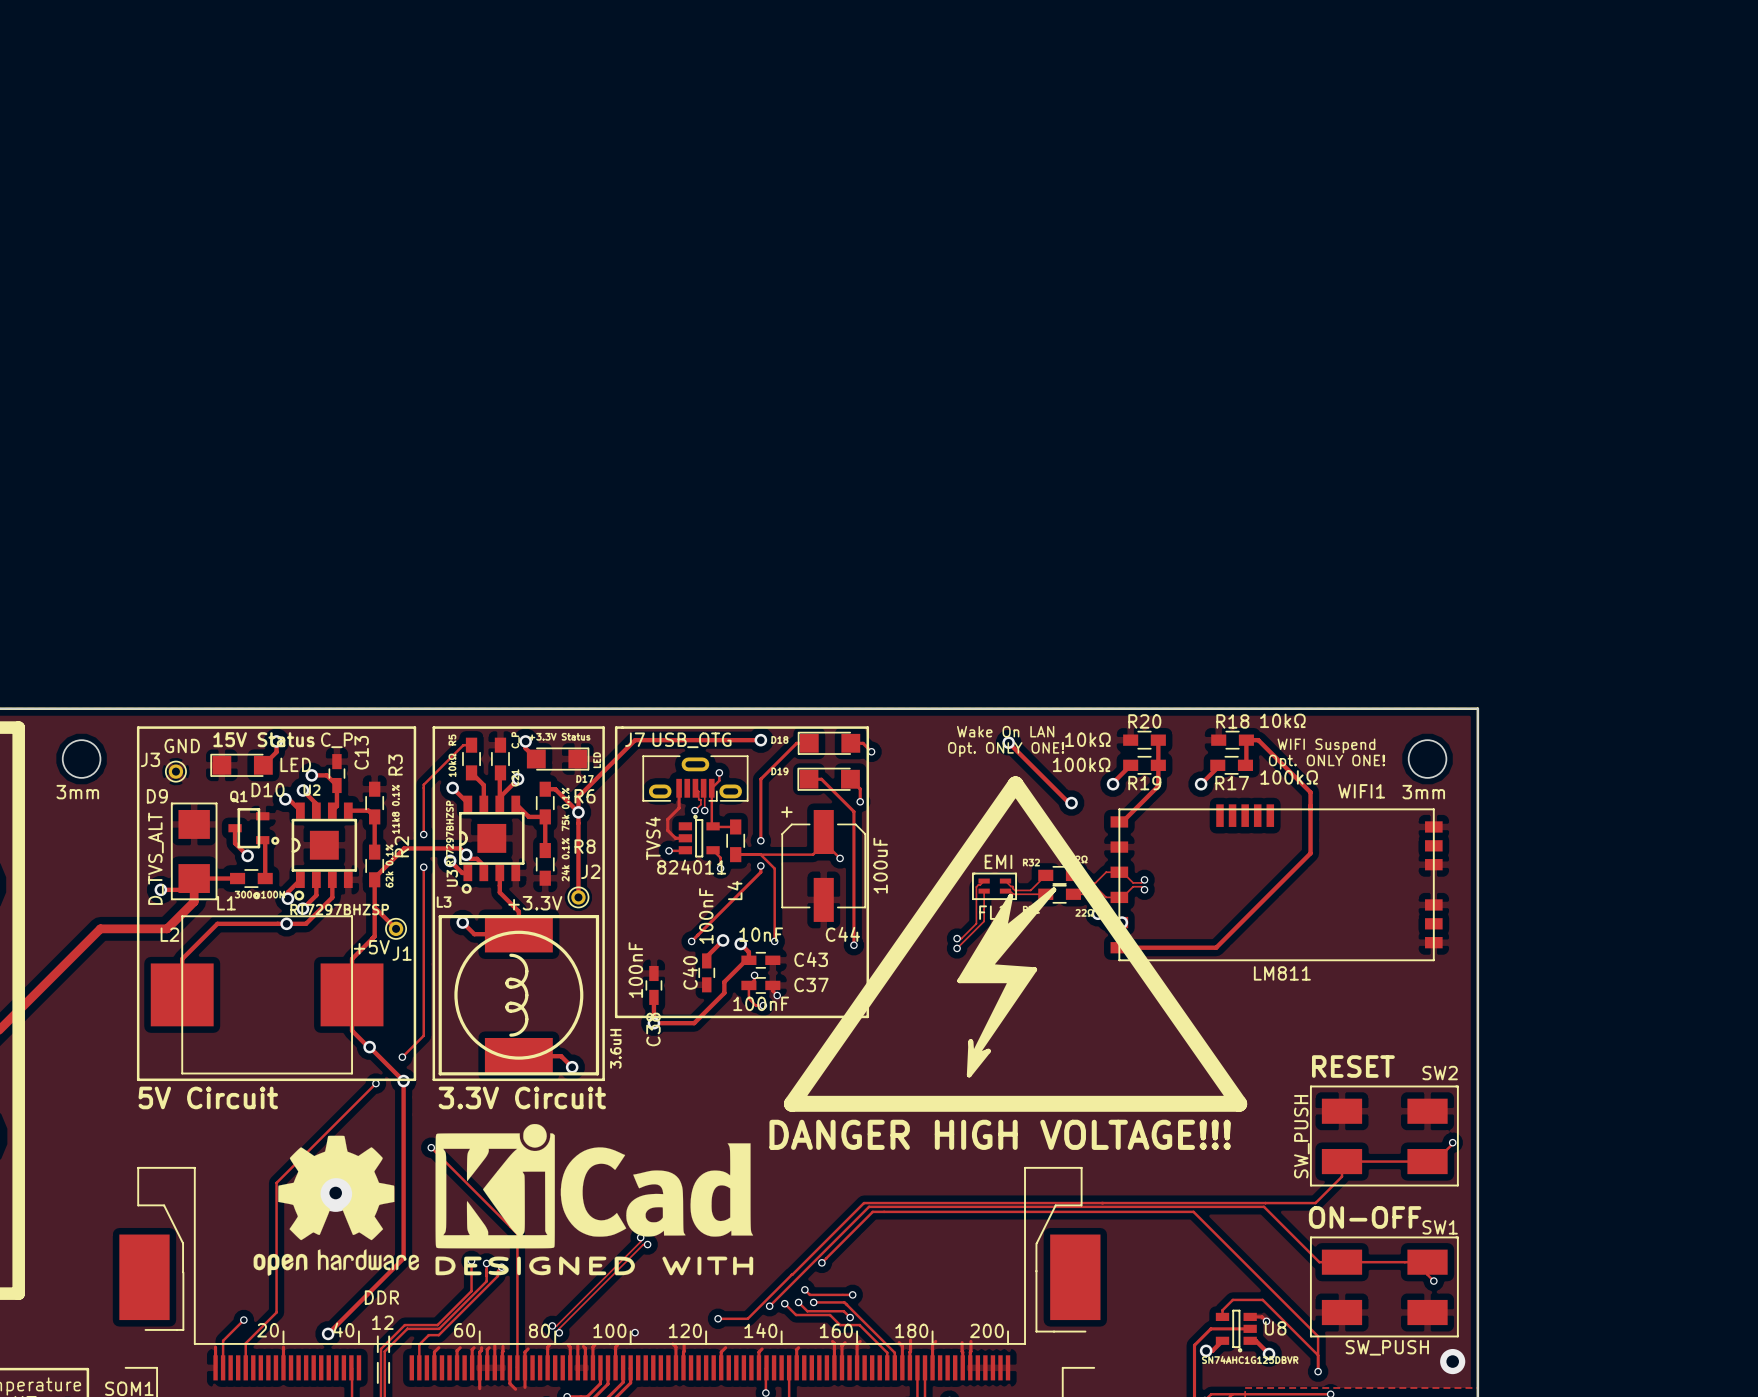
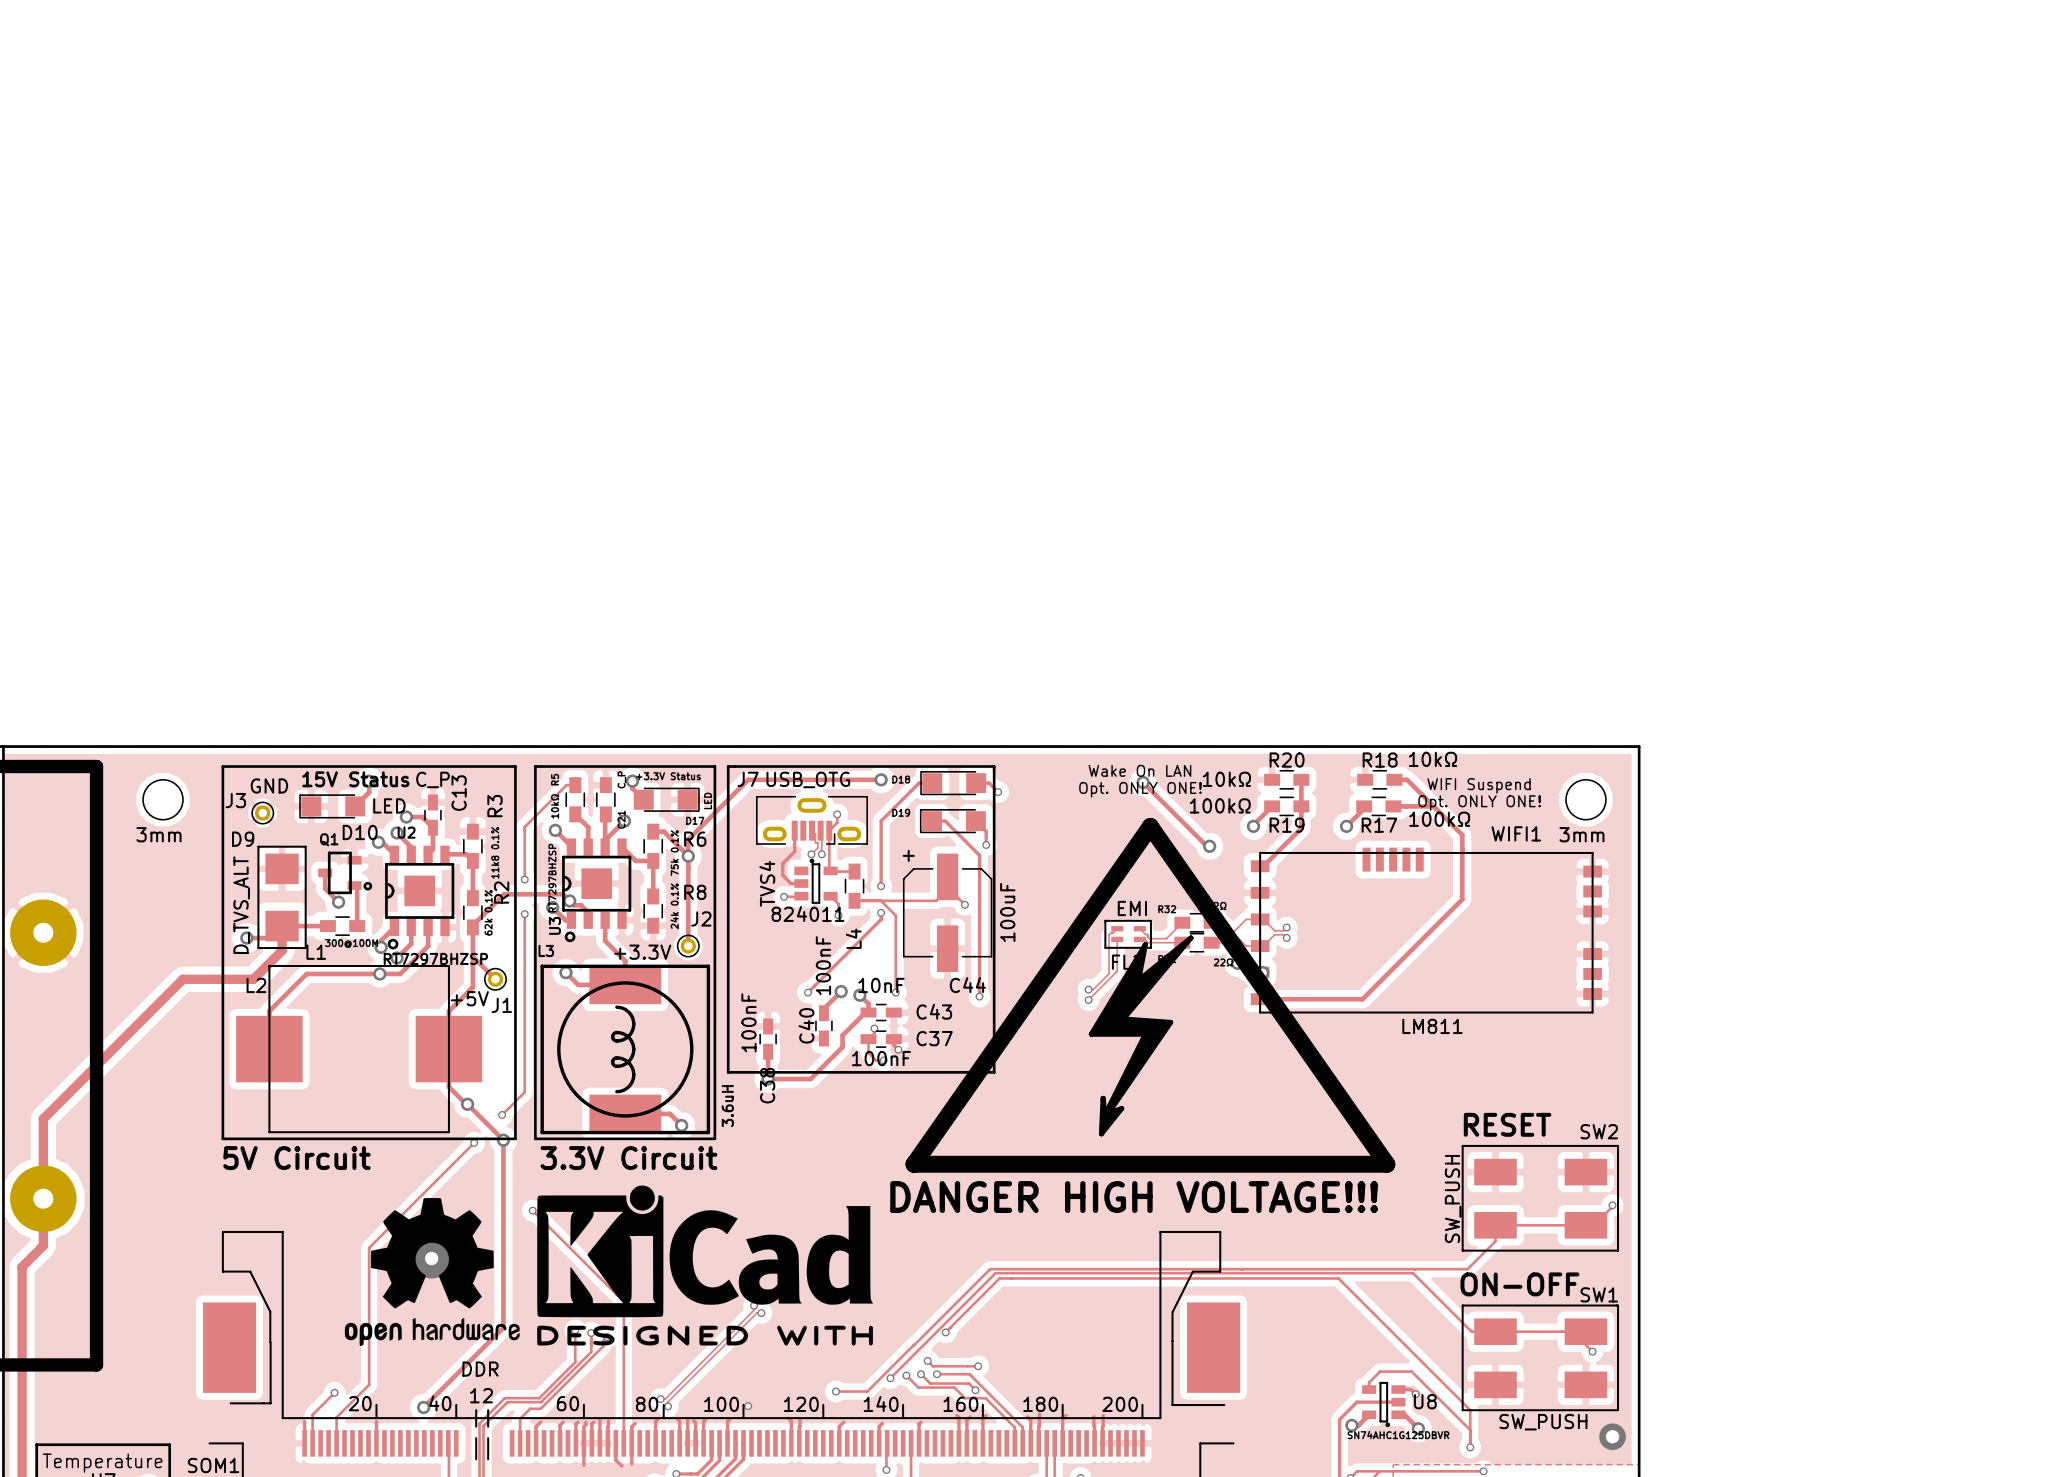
track: (1246, 740) (1246, 764) -> none
track: none -> (1393, 806) (1433, 806)

